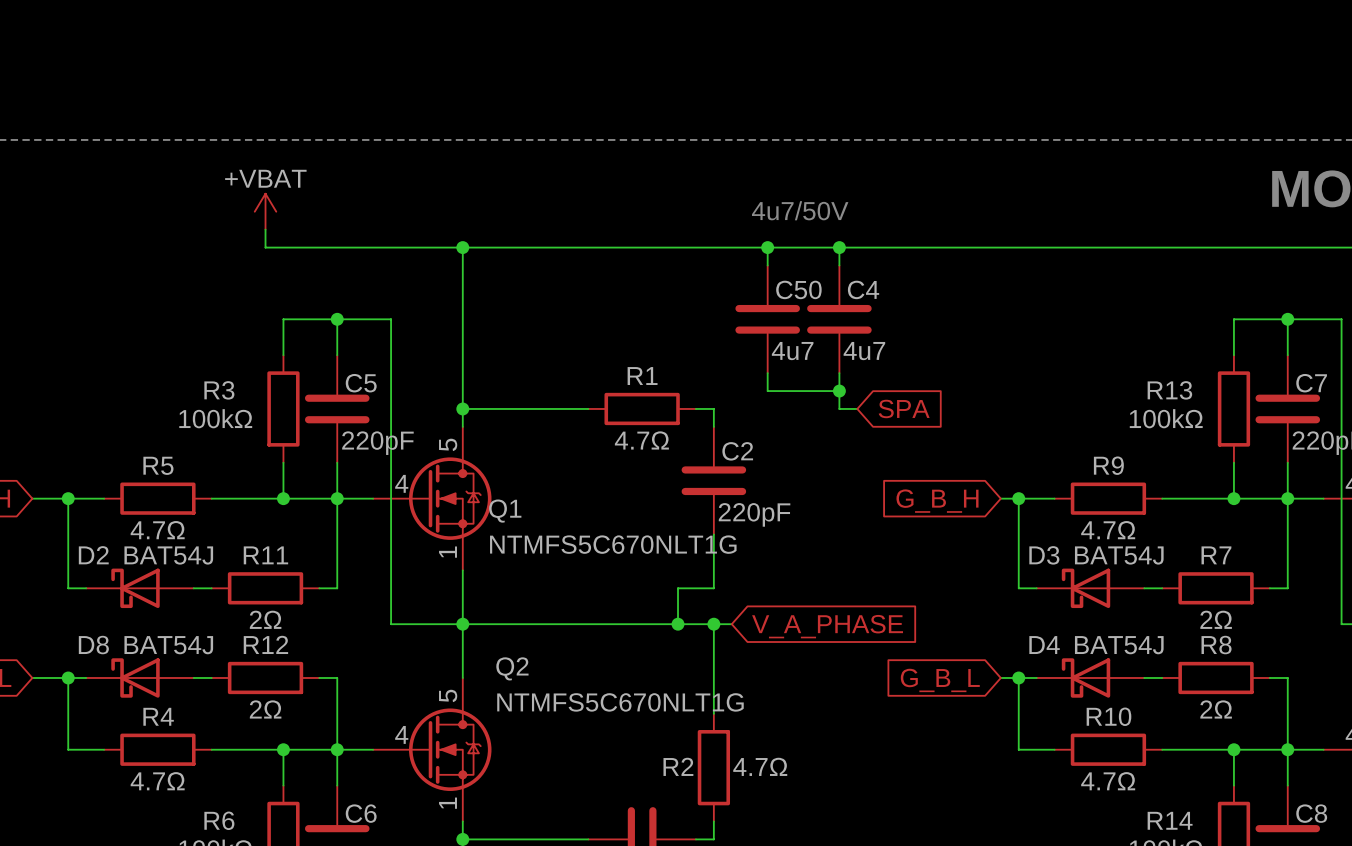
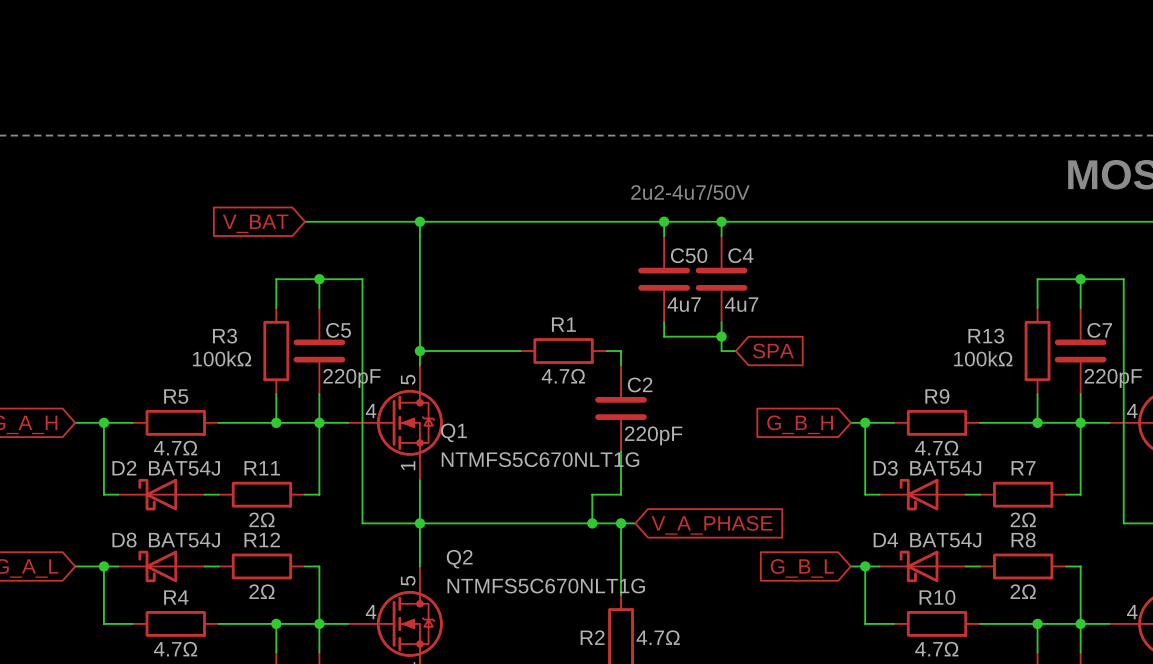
text: 4u7/50V (800, 210) -> 2u2-4u7/50V (690, 192)
power symbol: +VBAT (265, 211) -> none
wire: (265, 229) (265, 247) (319, 247) -> none
global label: none -> V_BAT (255, 223)

